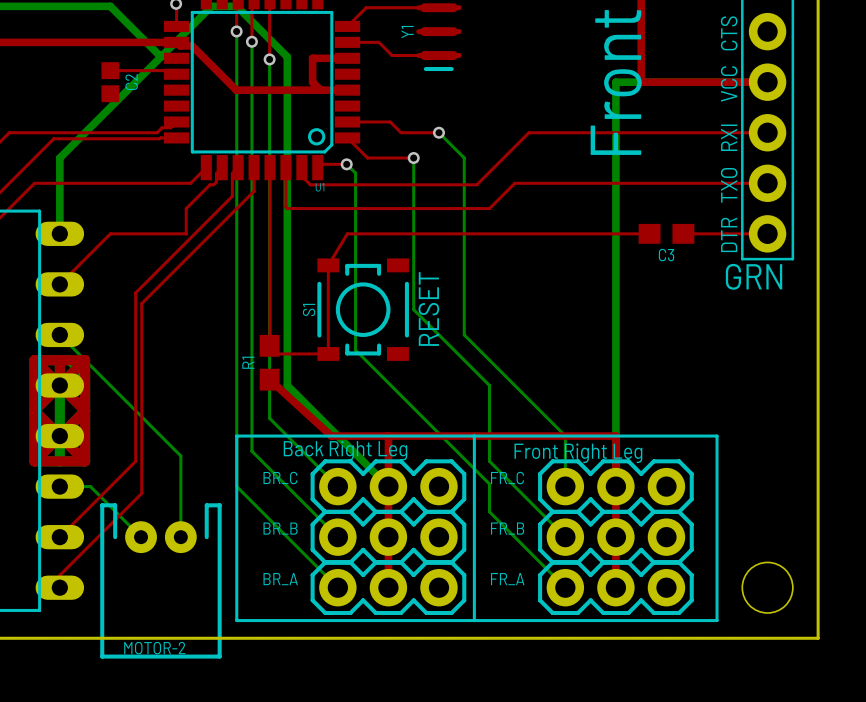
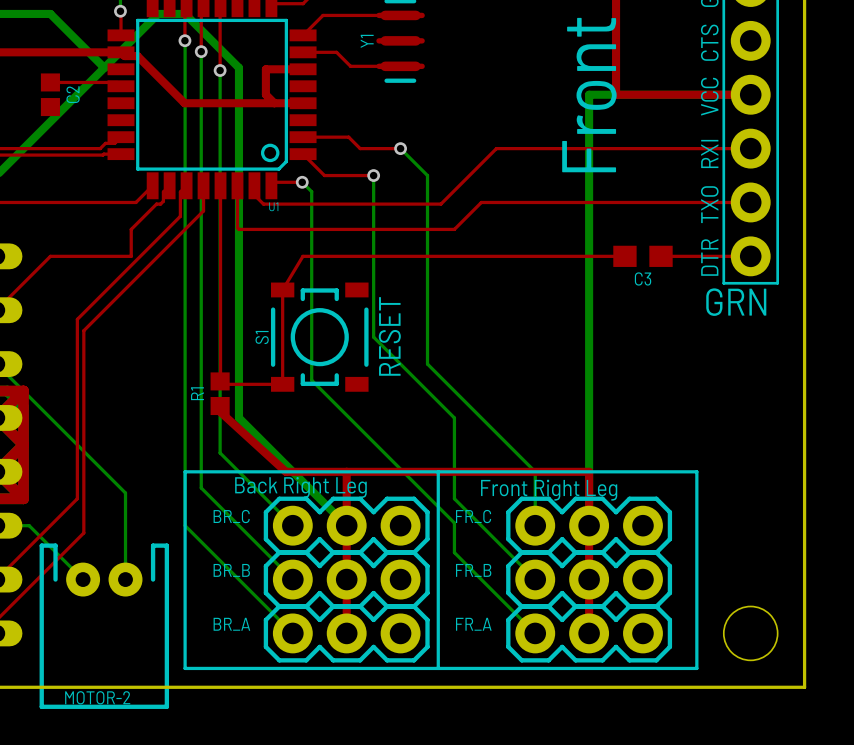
R1 footprint: [259, 334, 280, 391] -> [210, 372, 230, 416]

